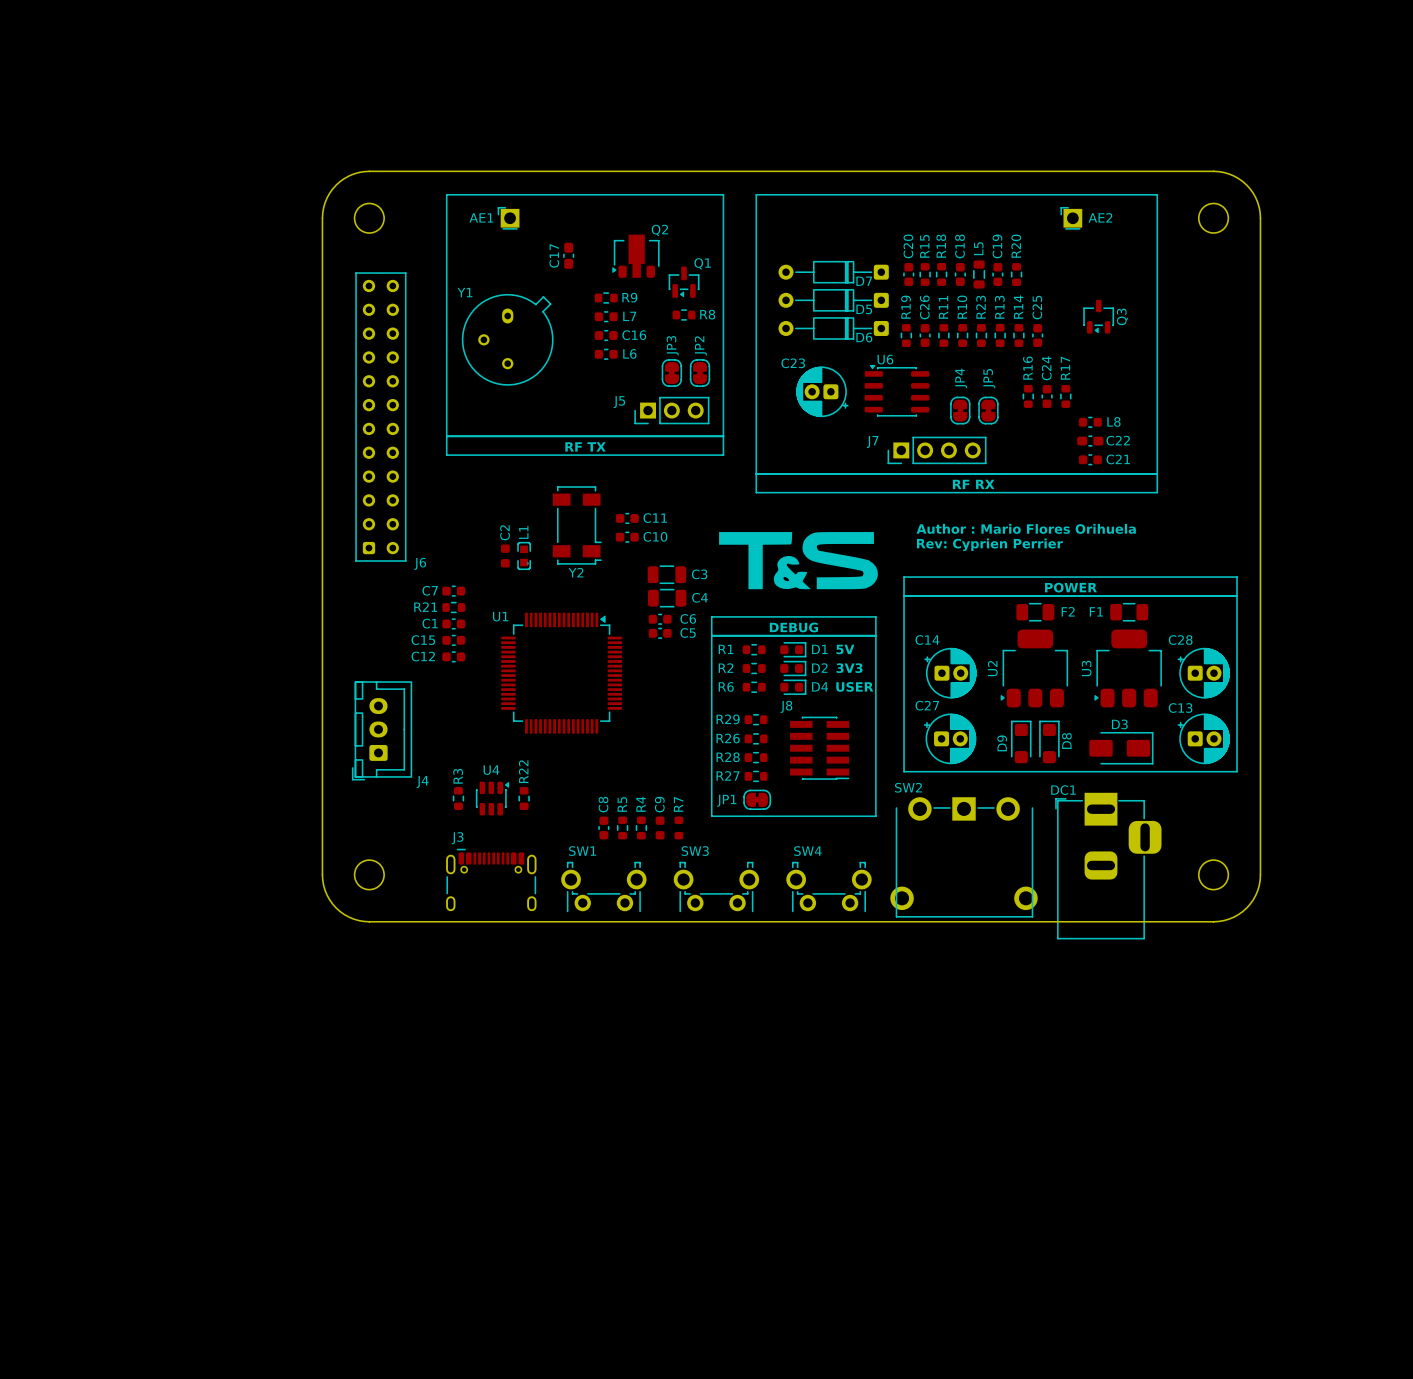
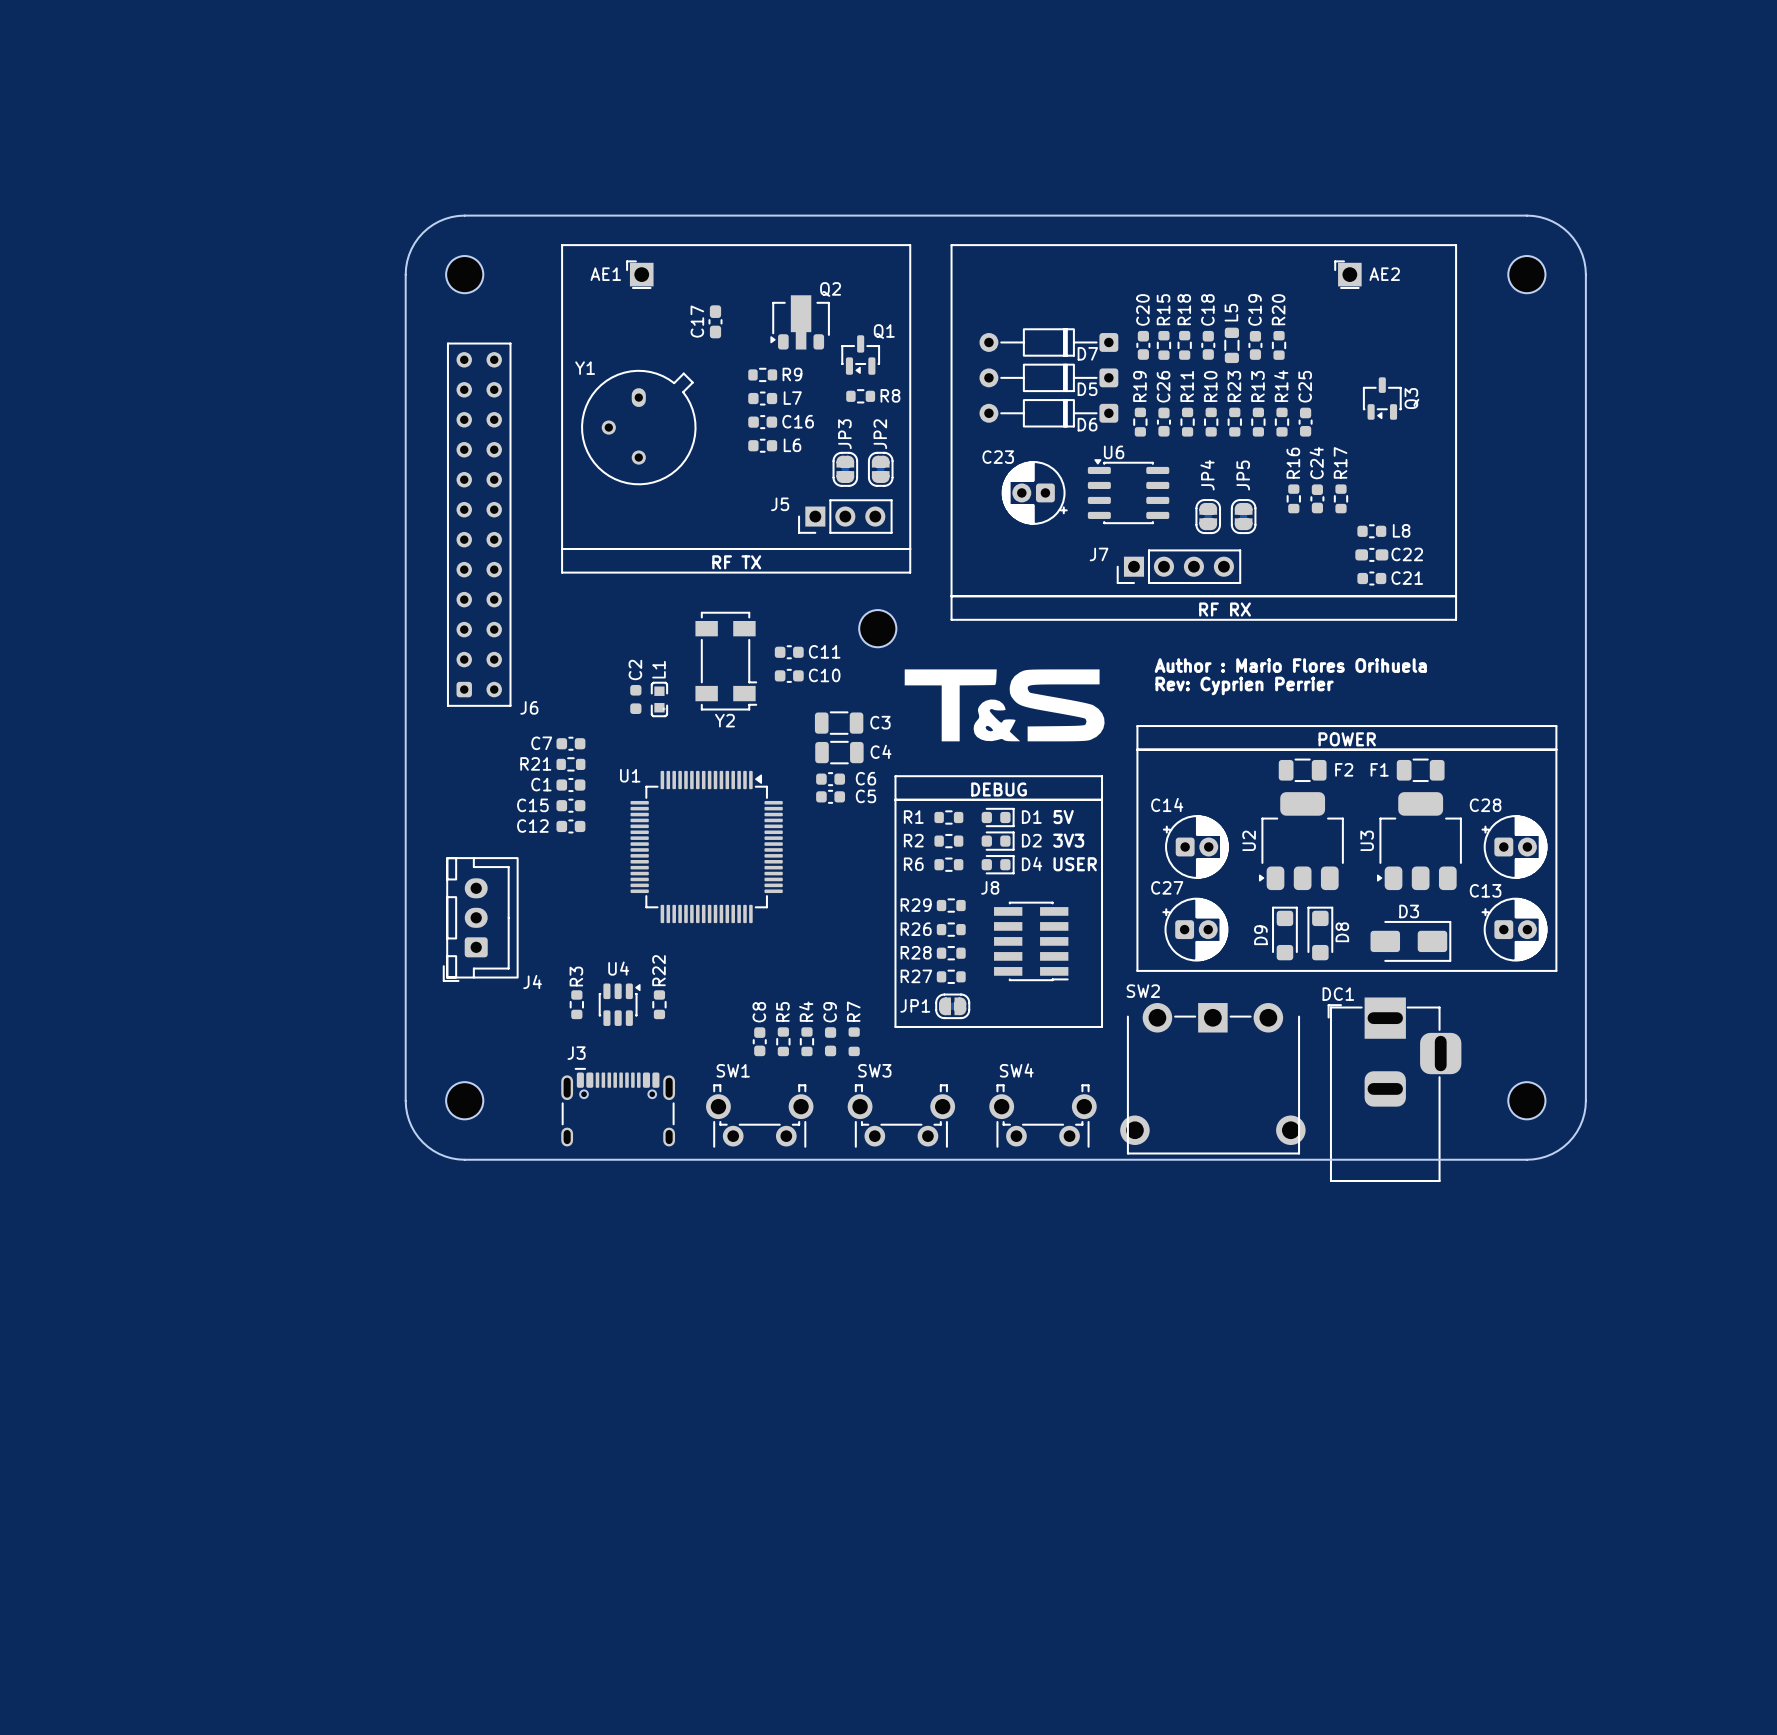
part: none -> (877, 628)

